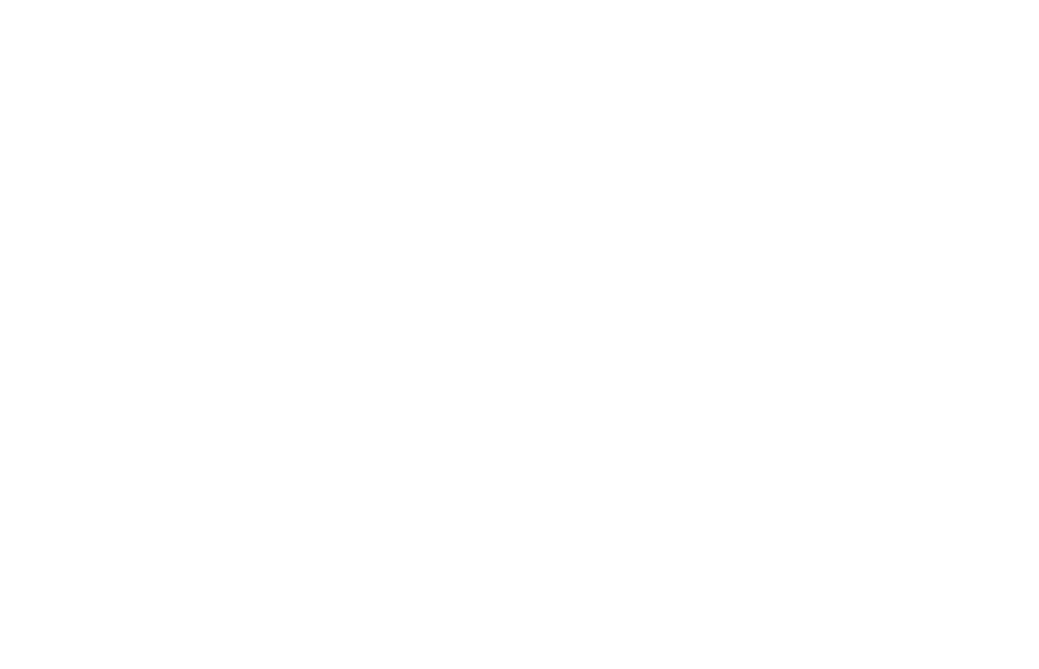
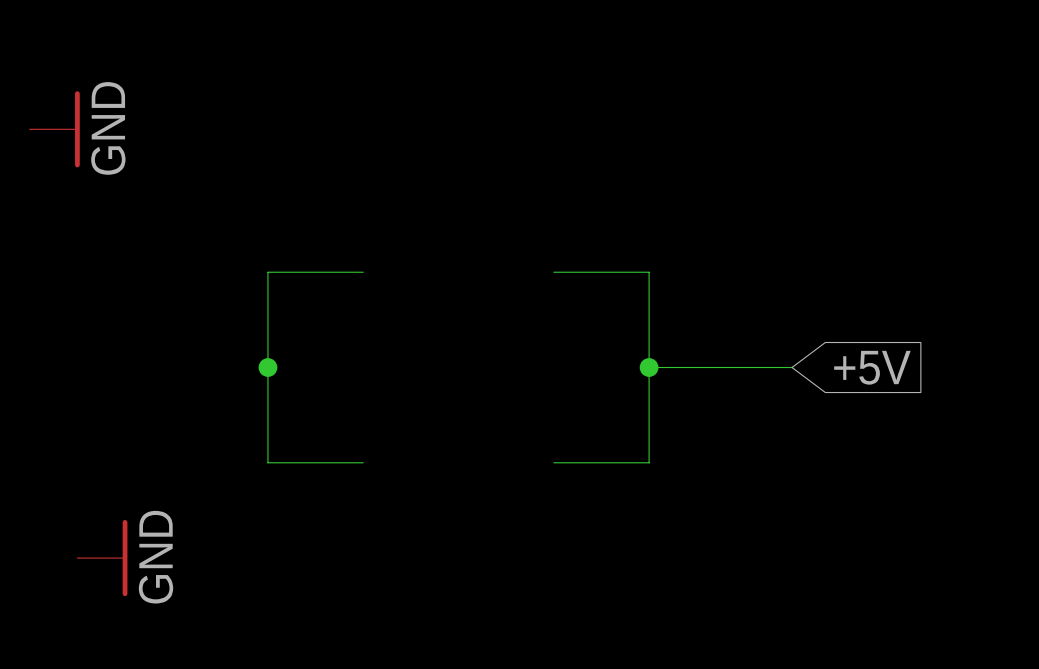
power symbol: none -> GND (54, 129)
wire: none -> (363, 272) (267, 272) (267, 462) (363, 462)
wire: none -> (553, 272) (649, 272) (649, 462) (553, 462)
junction: none -> (267, 367)
wire: none -> (649, 367) (792, 367)
junction: none -> (649, 367)
global label: none -> +5V (872, 367)
power symbol: none -> GND (102, 558)

